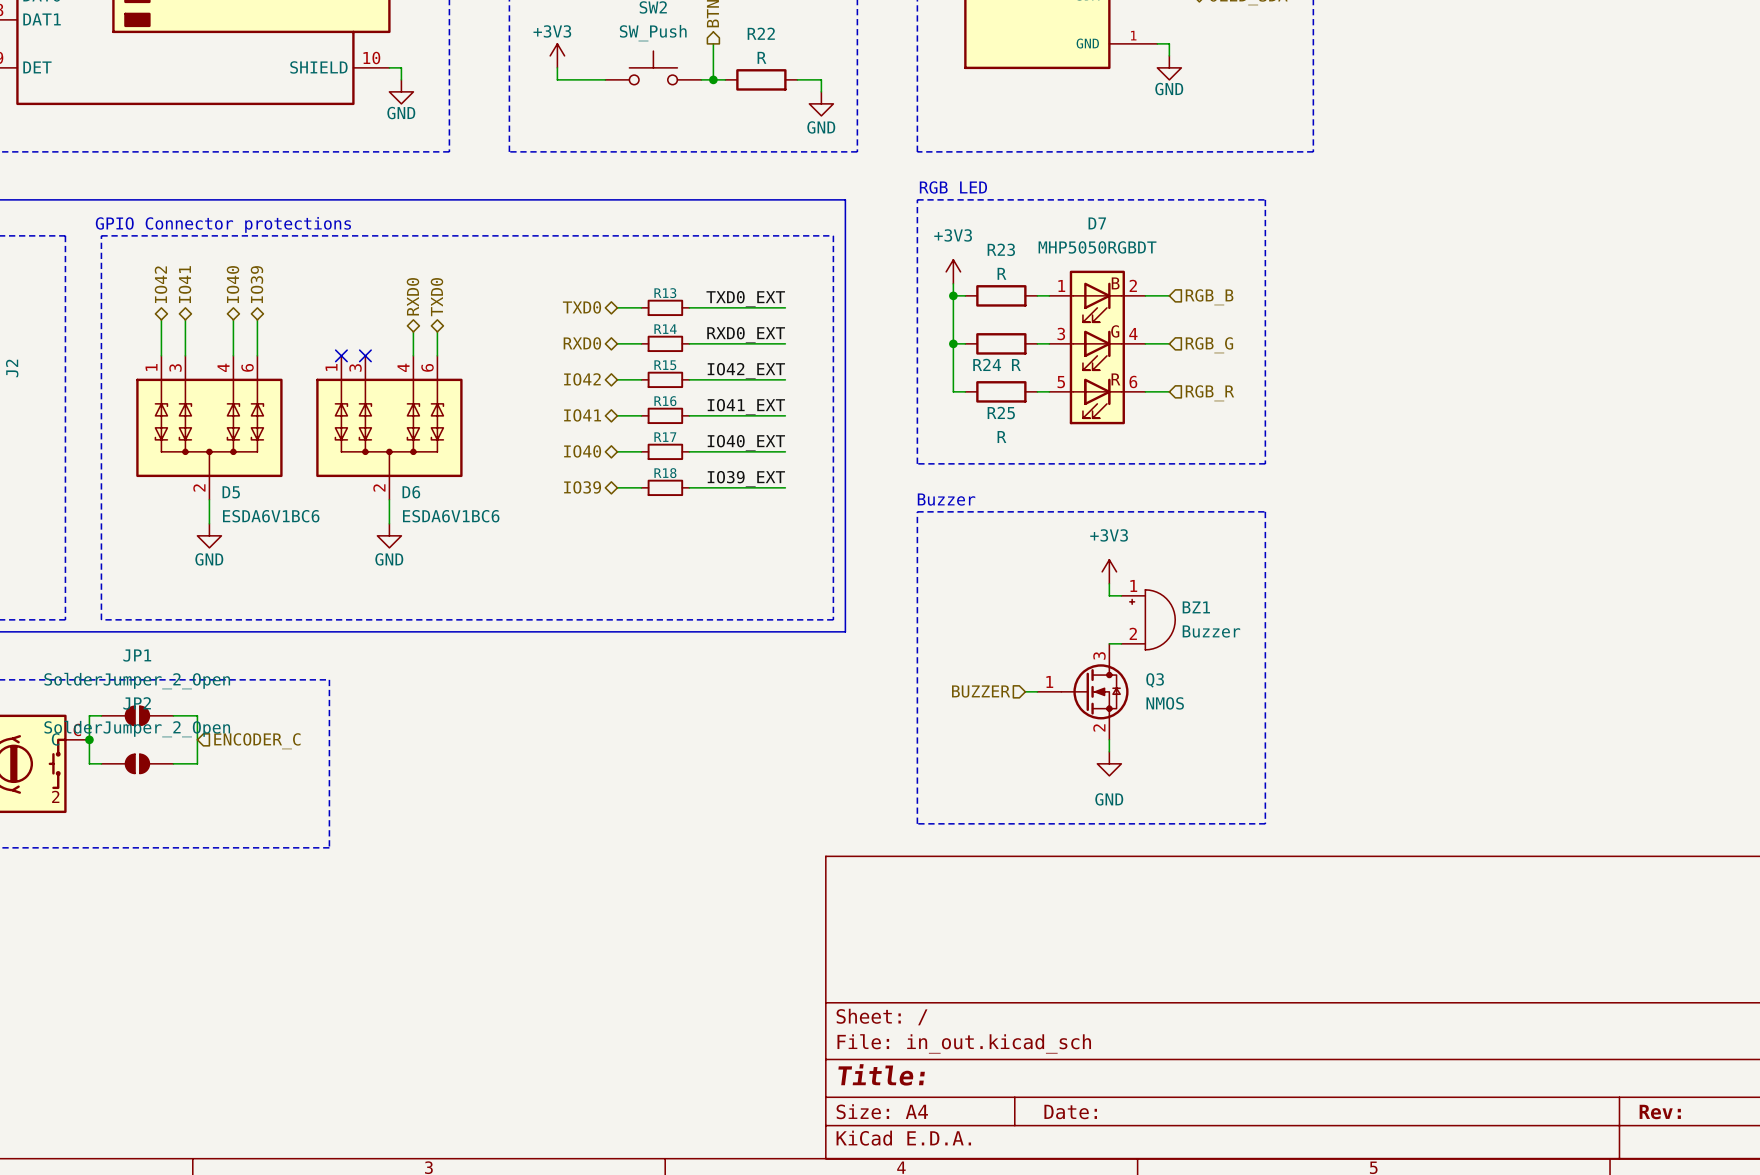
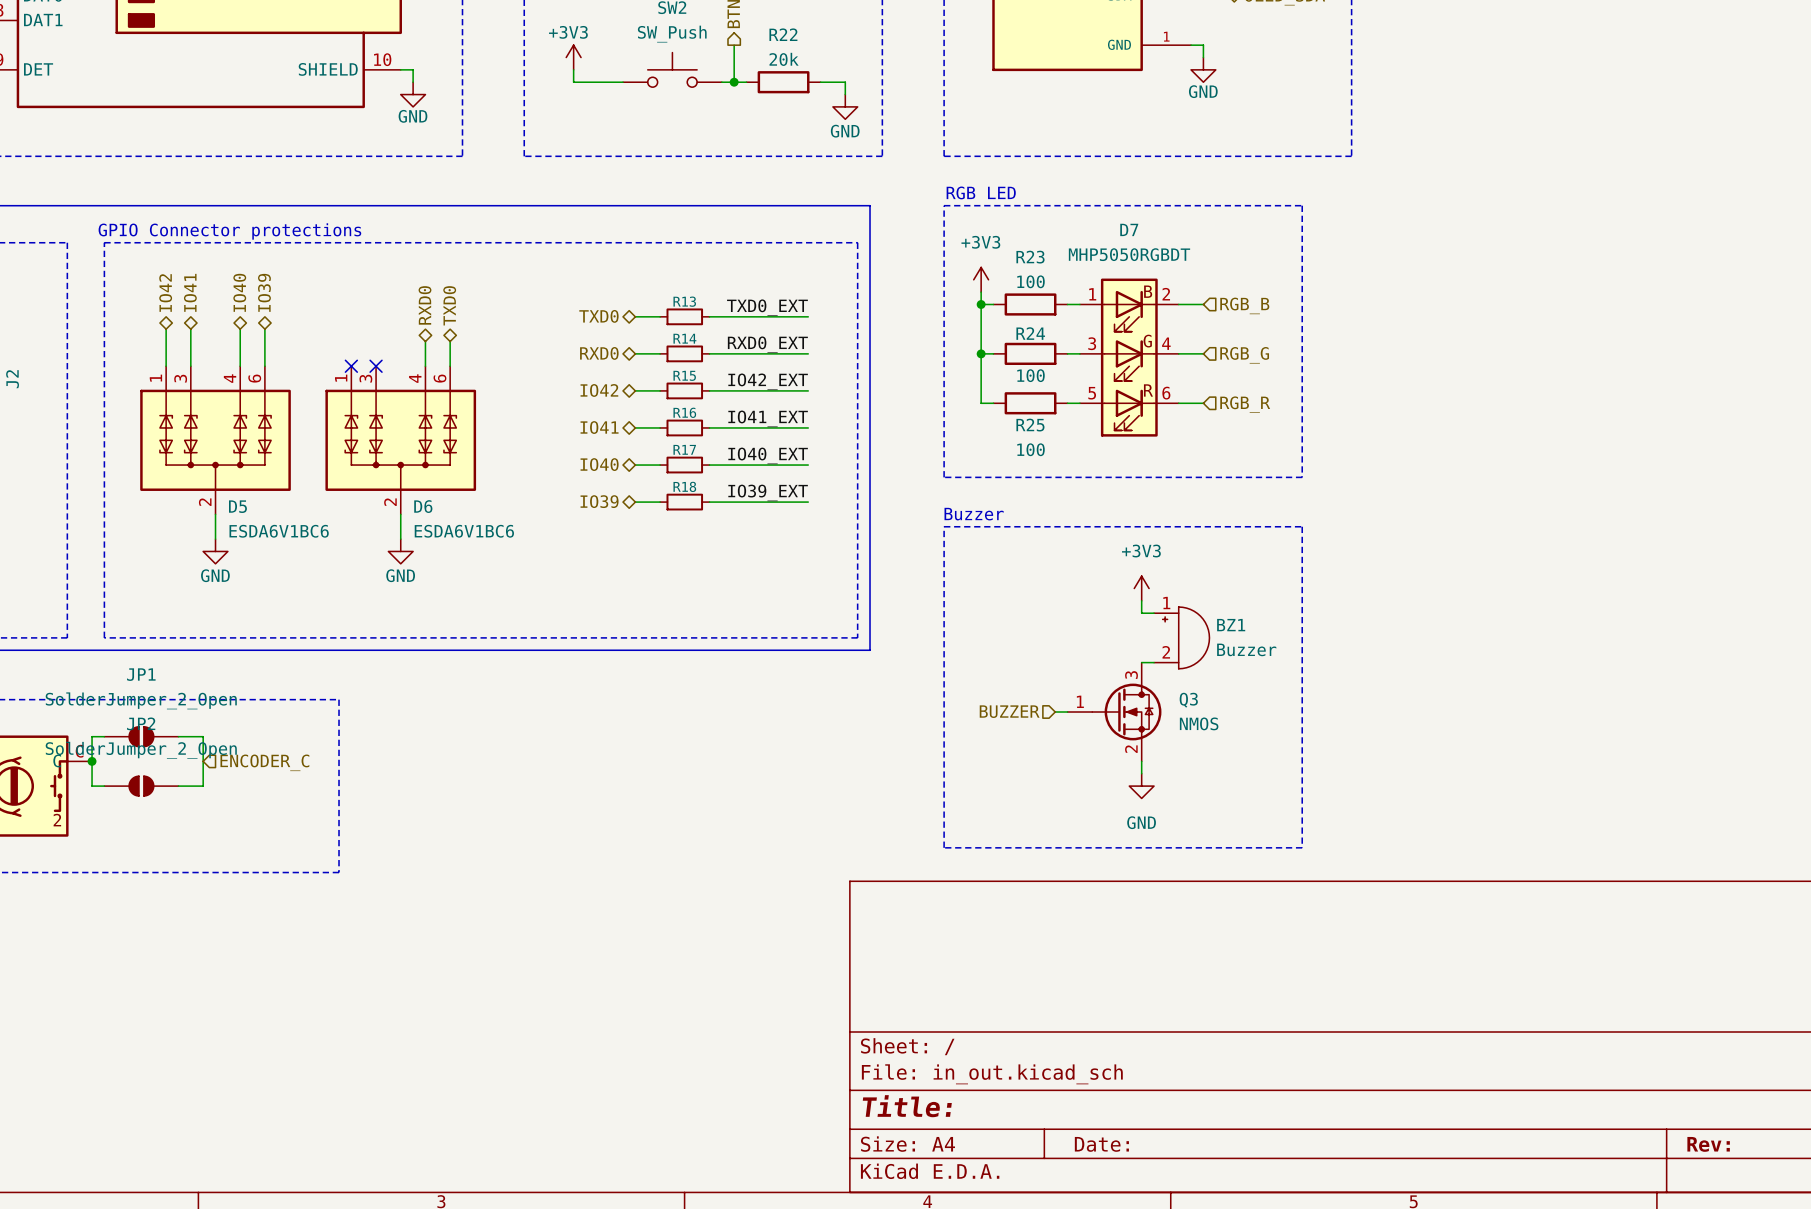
R22 value: R (761, 57) -> 20k (784, 59)
R23 value: R (1001, 273) -> 100 (1031, 281)
R24 name position: R24 (987, 364) -> R24 (1030, 333)
R24 value: R (1016, 365) -> 100 (1031, 375)
R25 value: R (1001, 437) -> 100 (1031, 449)

